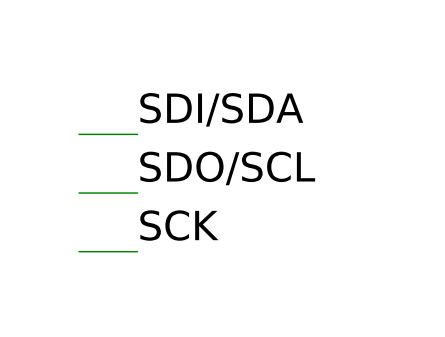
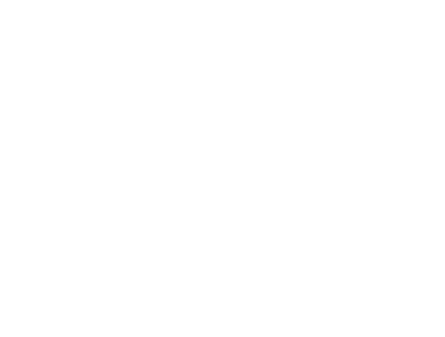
label: SDI/SDA (221, 109) -> none
wire: (78, 134) (137, 134) -> none
label: SDO/SCL (227, 168) -> none
wire: (78, 193) (137, 193) -> none
label: SCK (179, 225) -> none
wire: (78, 251) (137, 251) -> none

